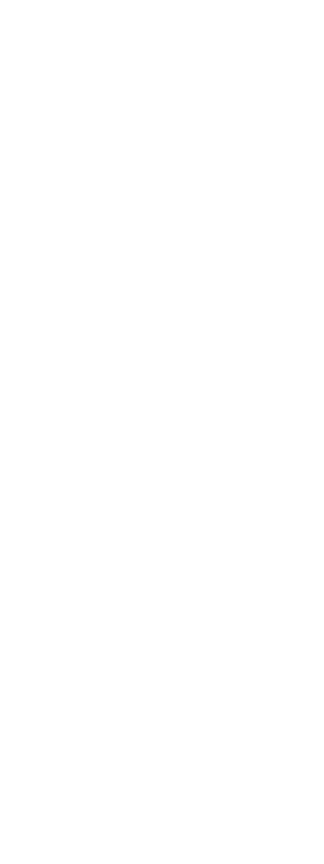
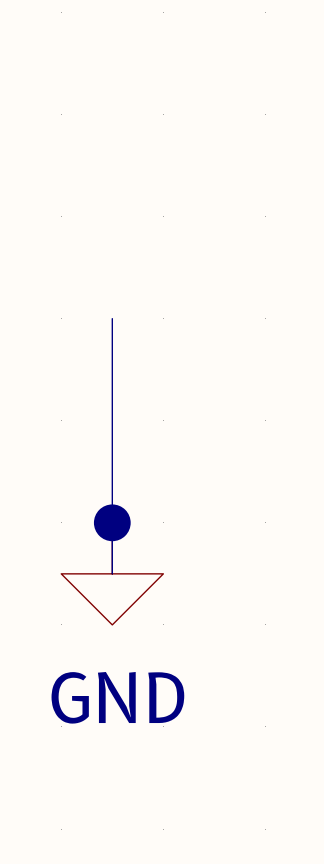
wire: none -> (112, 318) (112, 573)
junction: none -> (112, 522)
power symbol: none -> GND (112, 573)

